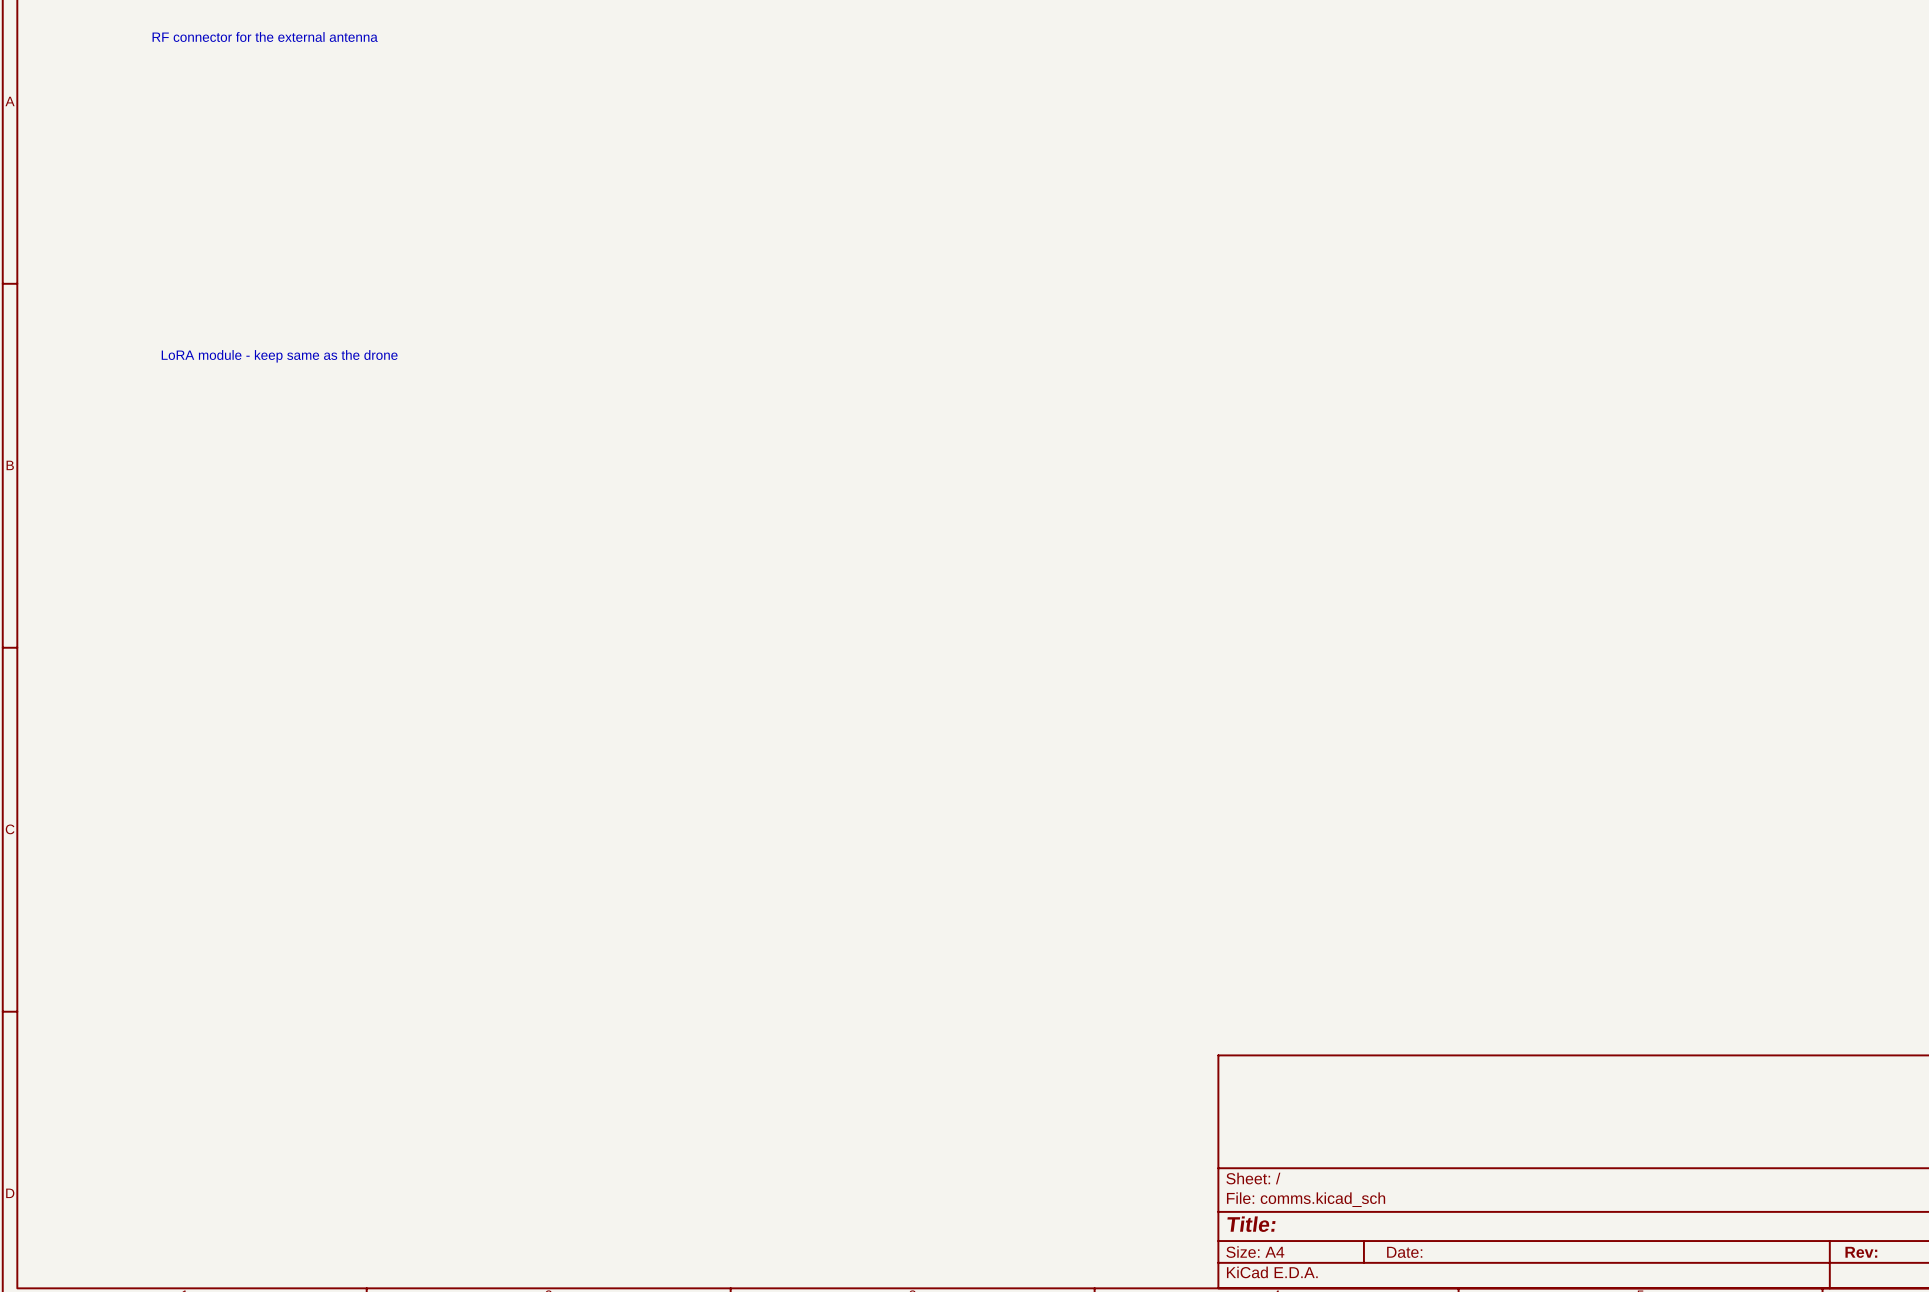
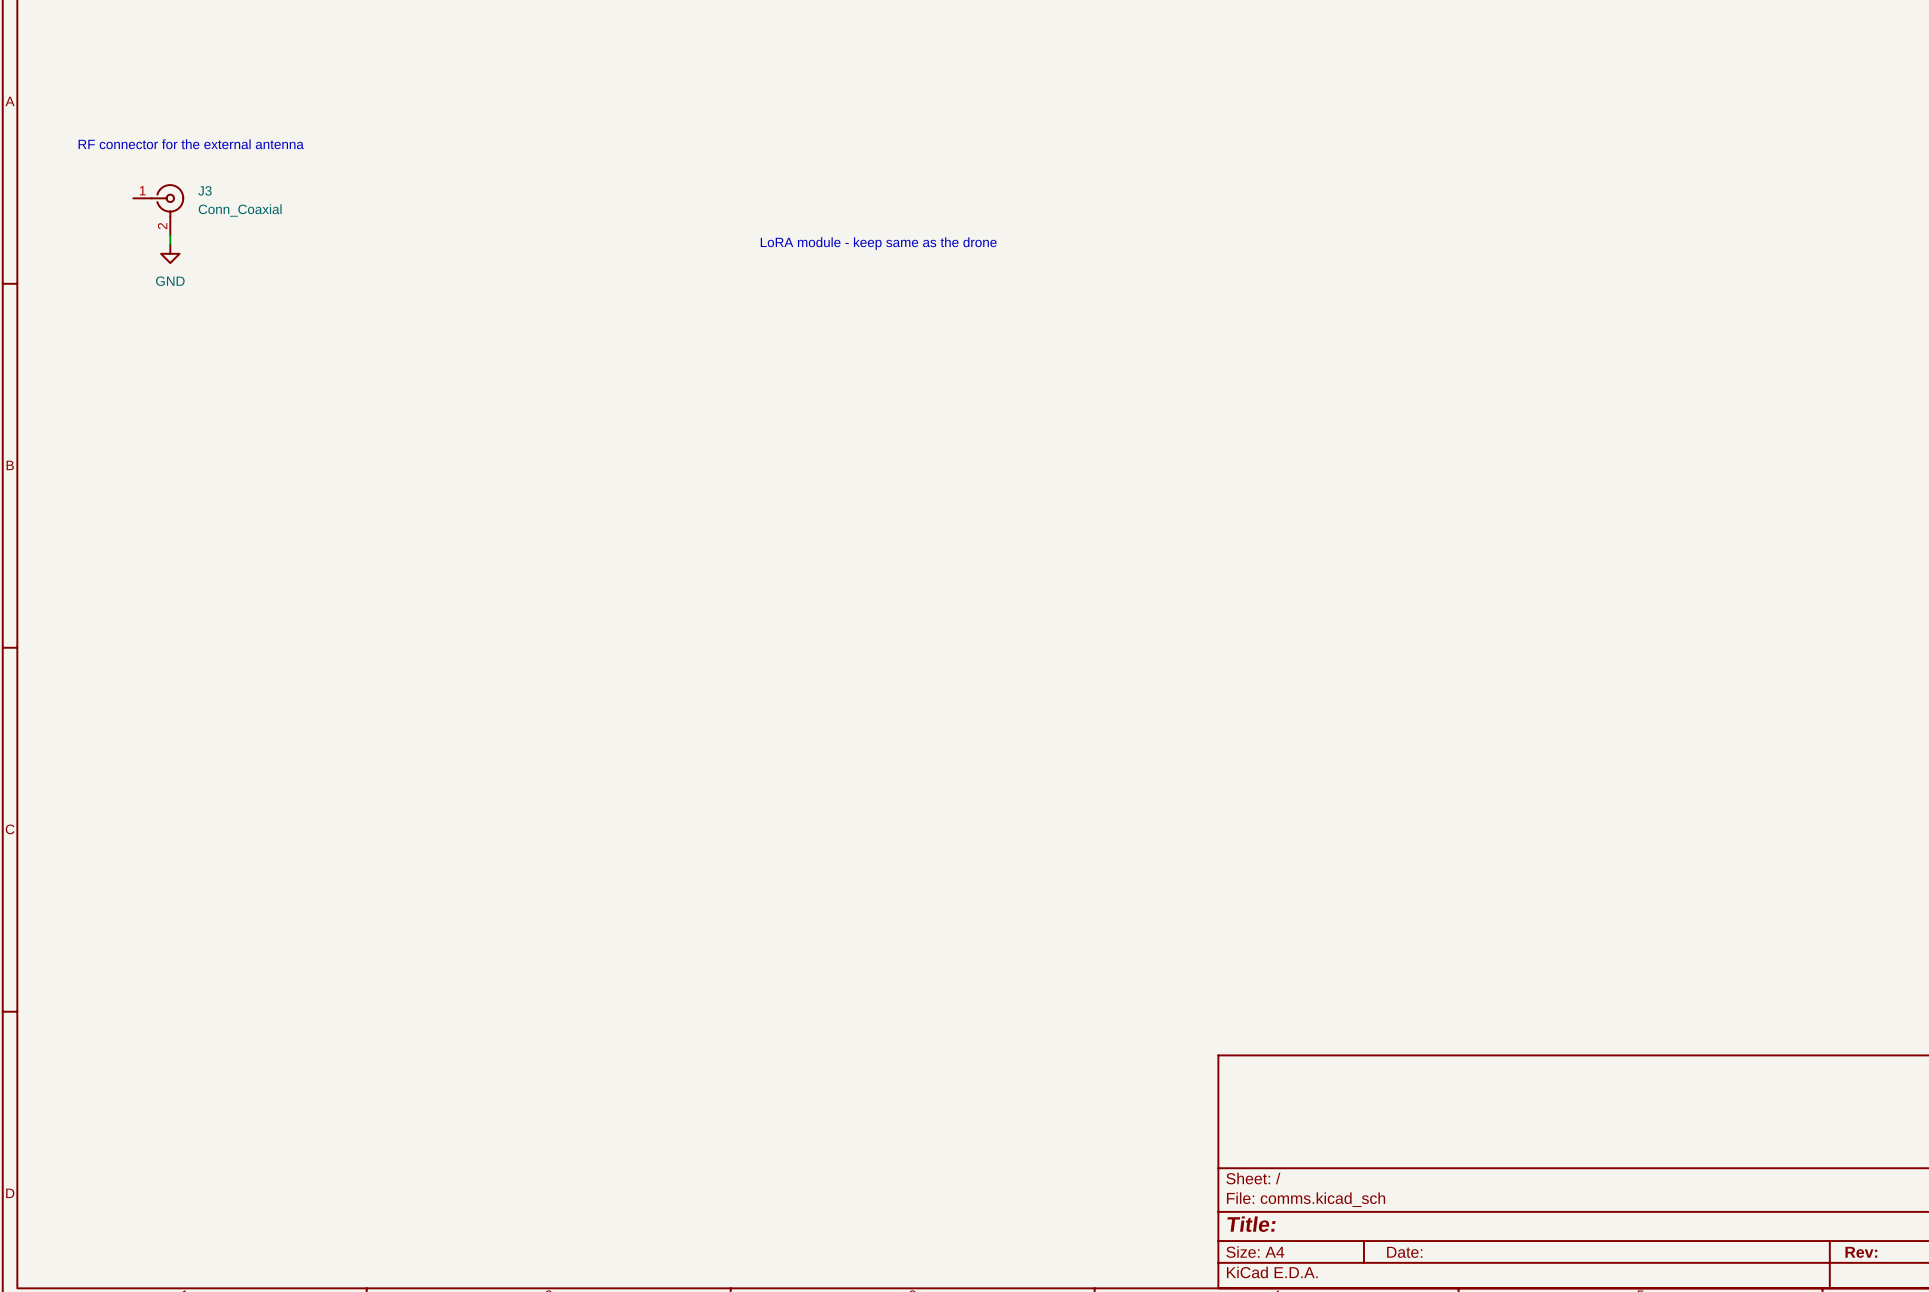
text position: RF connector for the external antenna (265, 36) -> RF connector for the external antenna (191, 144)
J3: none -> Conn_Coaxial (158, 209)
wire: none -> (170, 235) (170, 244)
text: none -> LoRA module - keep same as the drone (878, 243)
power symbol: none -> GND (170, 253)
text: LoRA module - keep same as the drone (279, 356) -> none

